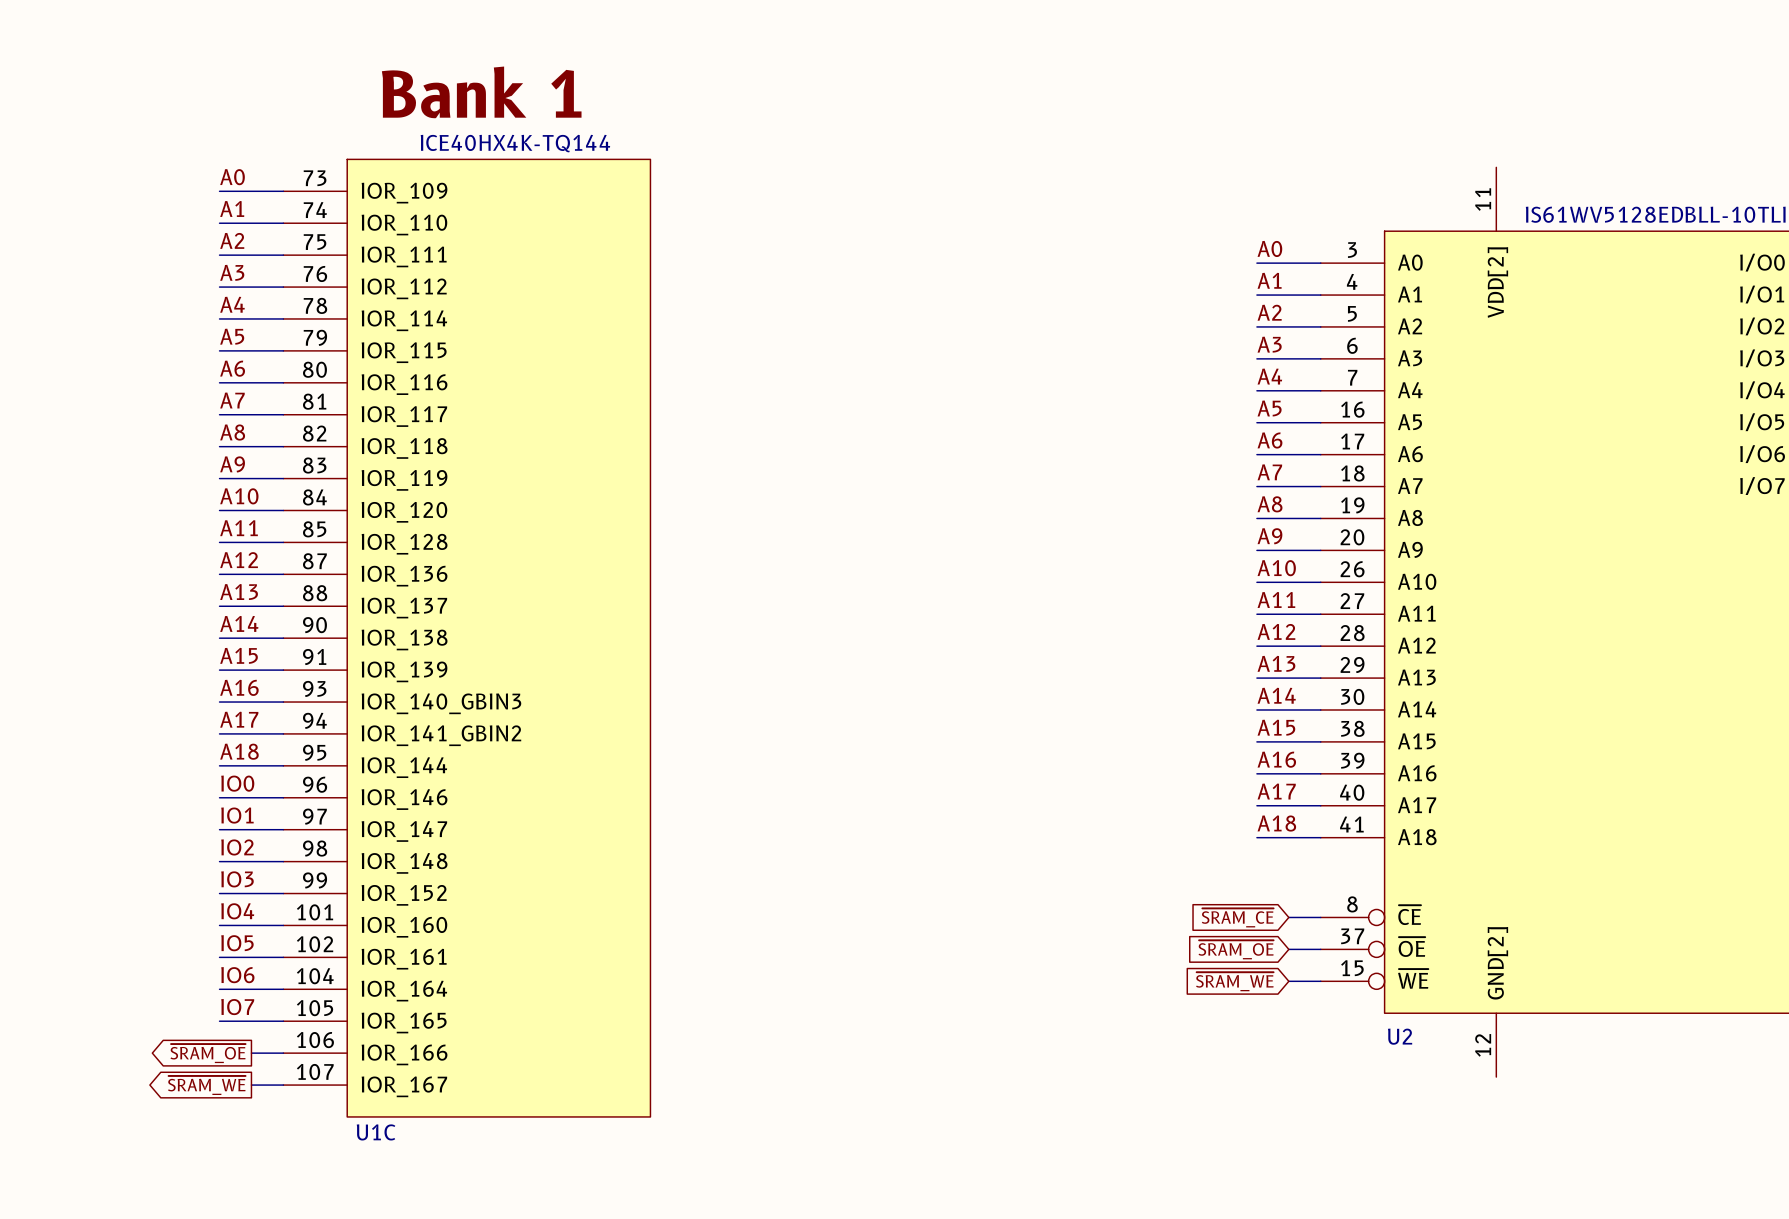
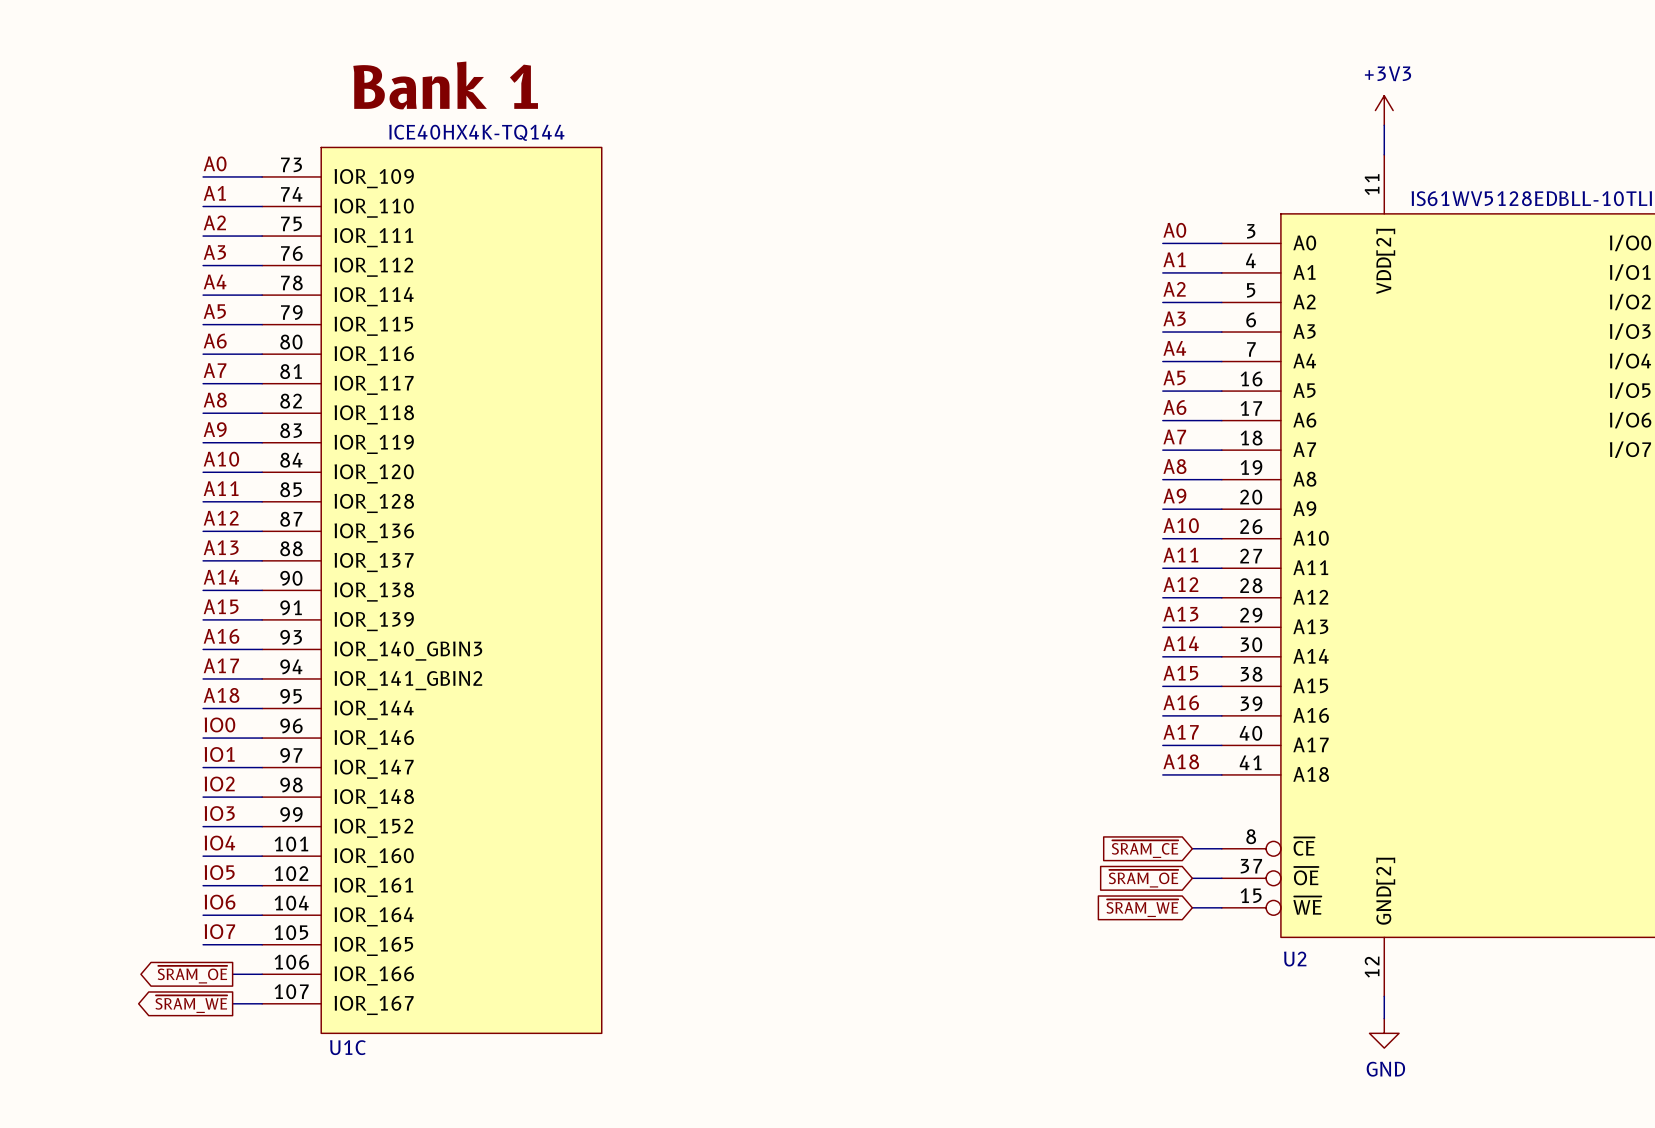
power symbol: none -> +3V3 (1384, 110)
wire: none -> (1384, 125) (1384, 154)
wire: none -> (1384, 996) (1384, 1018)
power symbol: none -> GND (1384, 1033)

